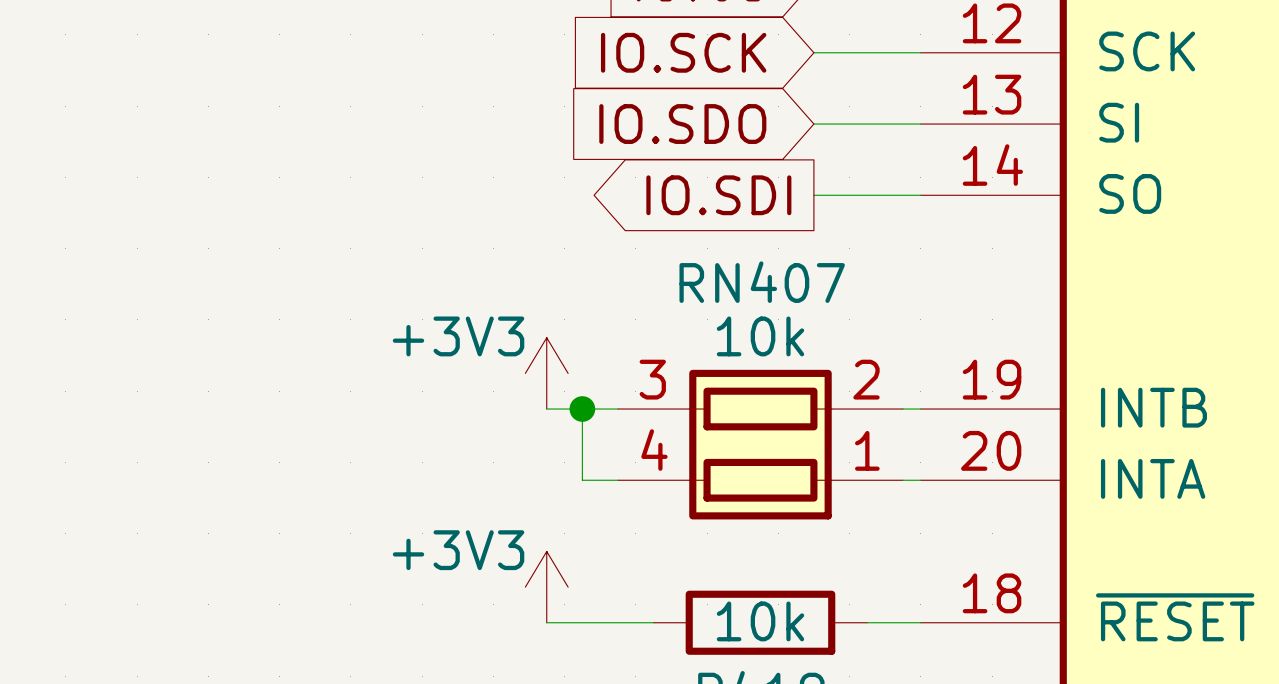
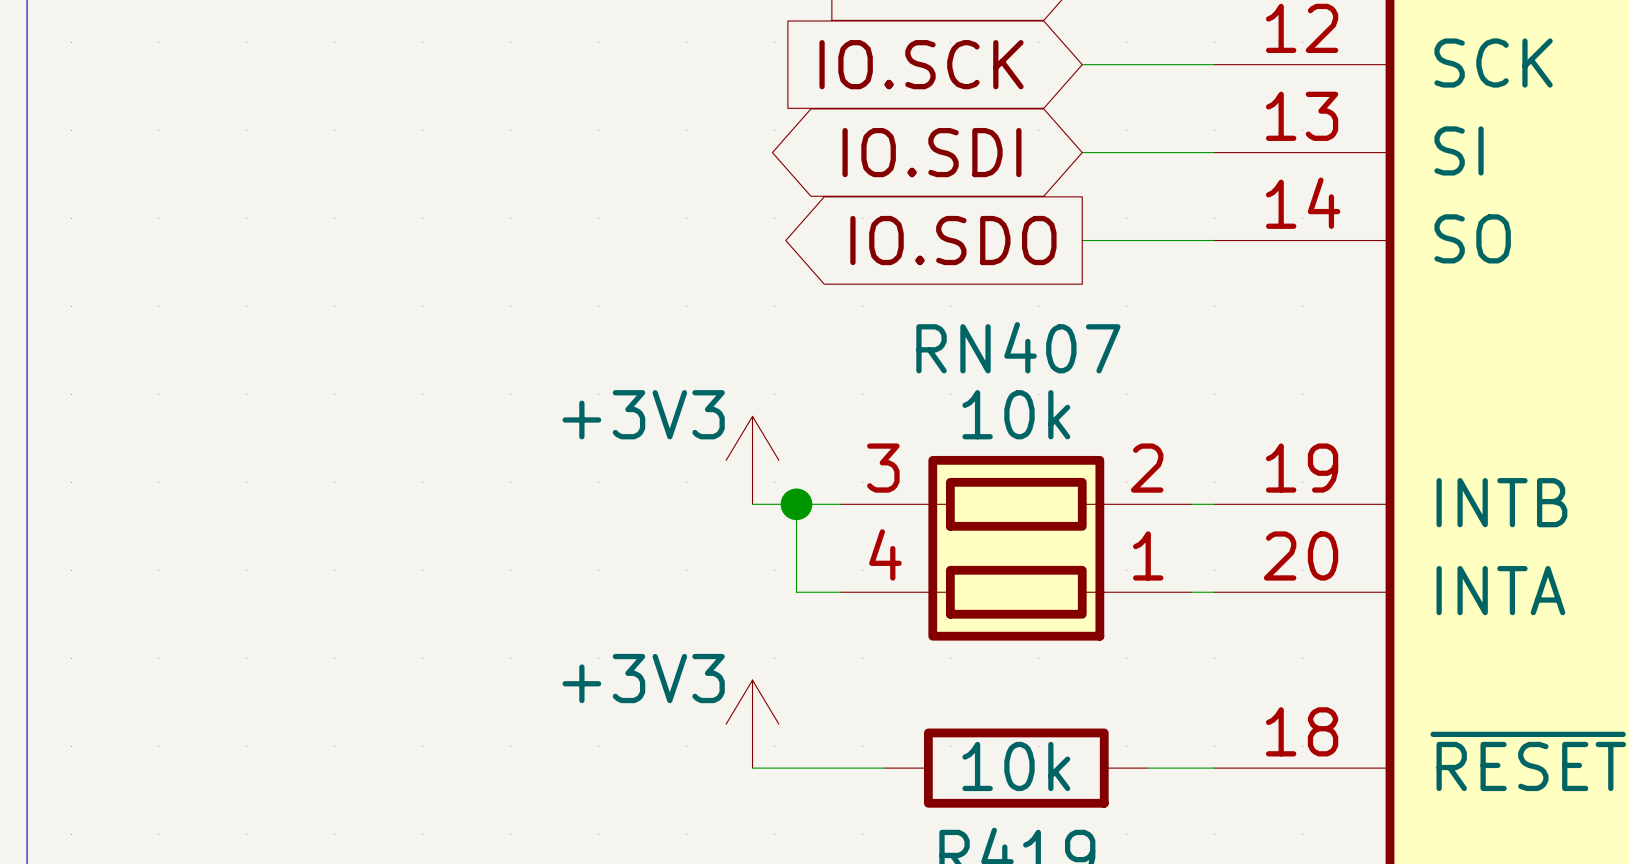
global label shape: input (682, 124) -> bidirectional (931, 152)
global label: IO.SDO (682, 124) -> IO.SDI (931, 152)
global label: IO.SDI (718, 195) -> IO.SDO (953, 240)

